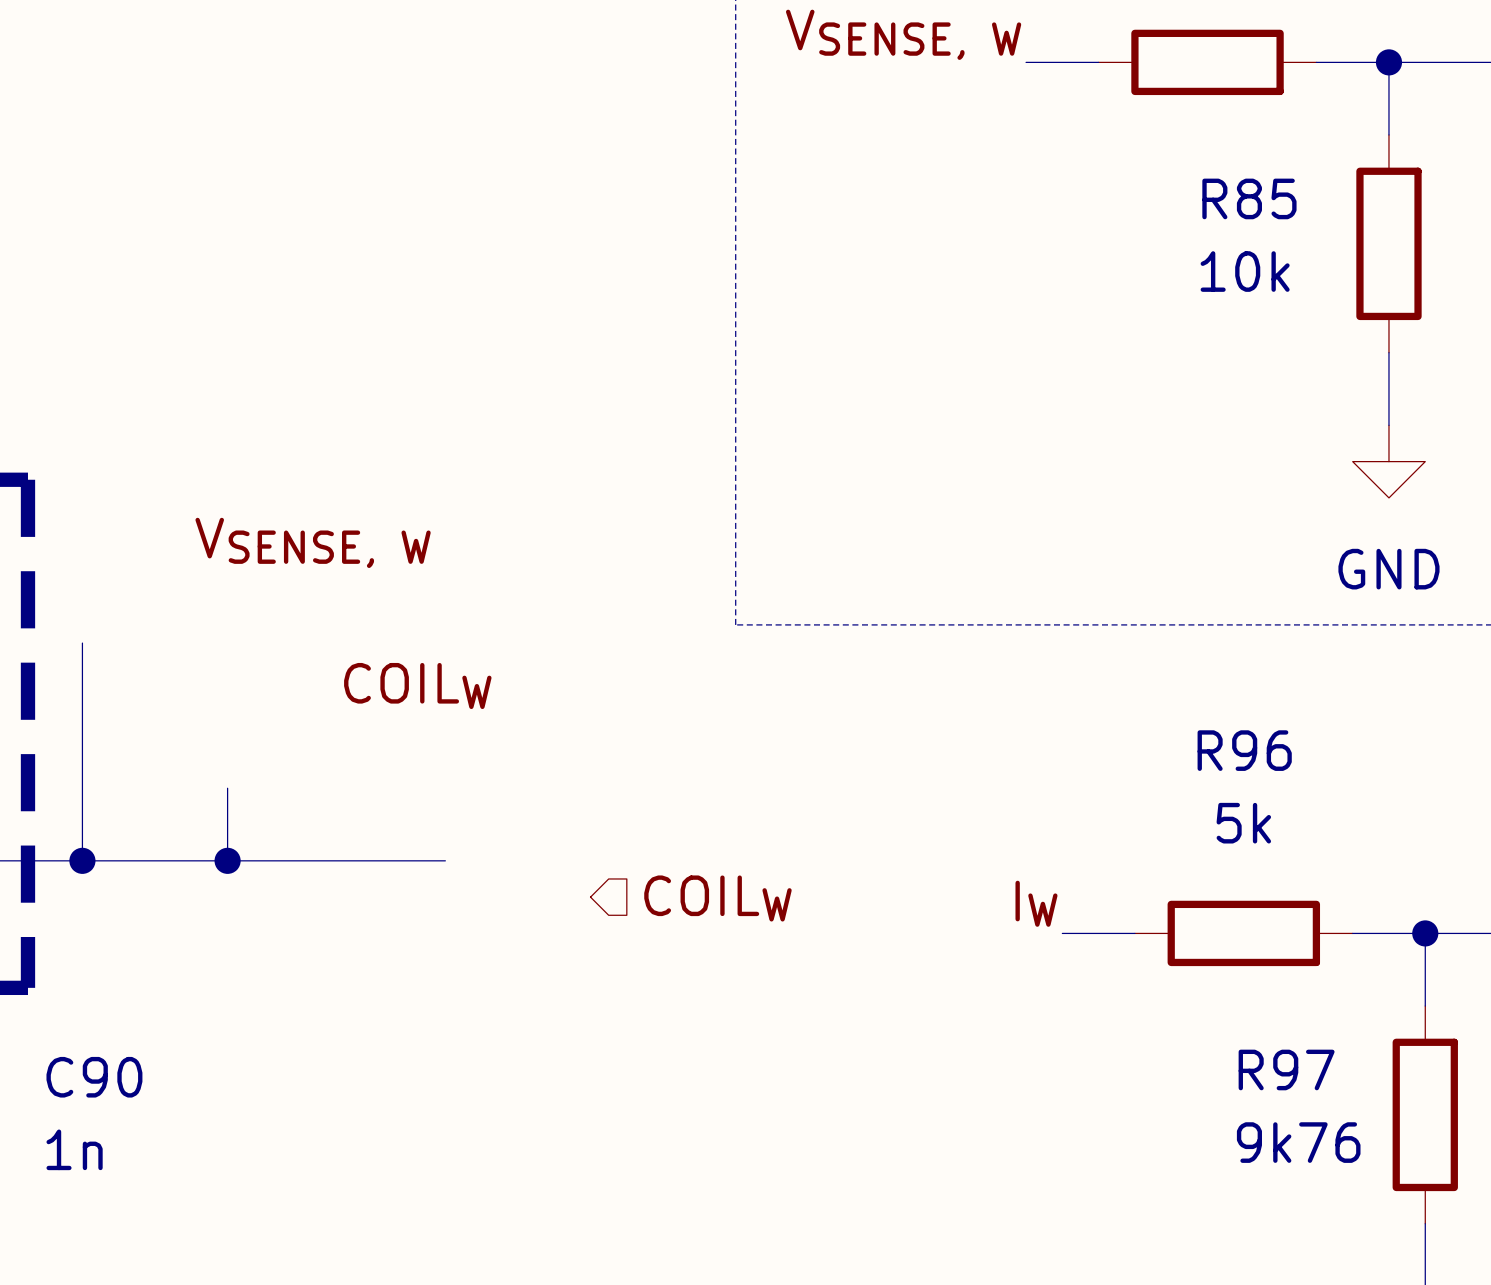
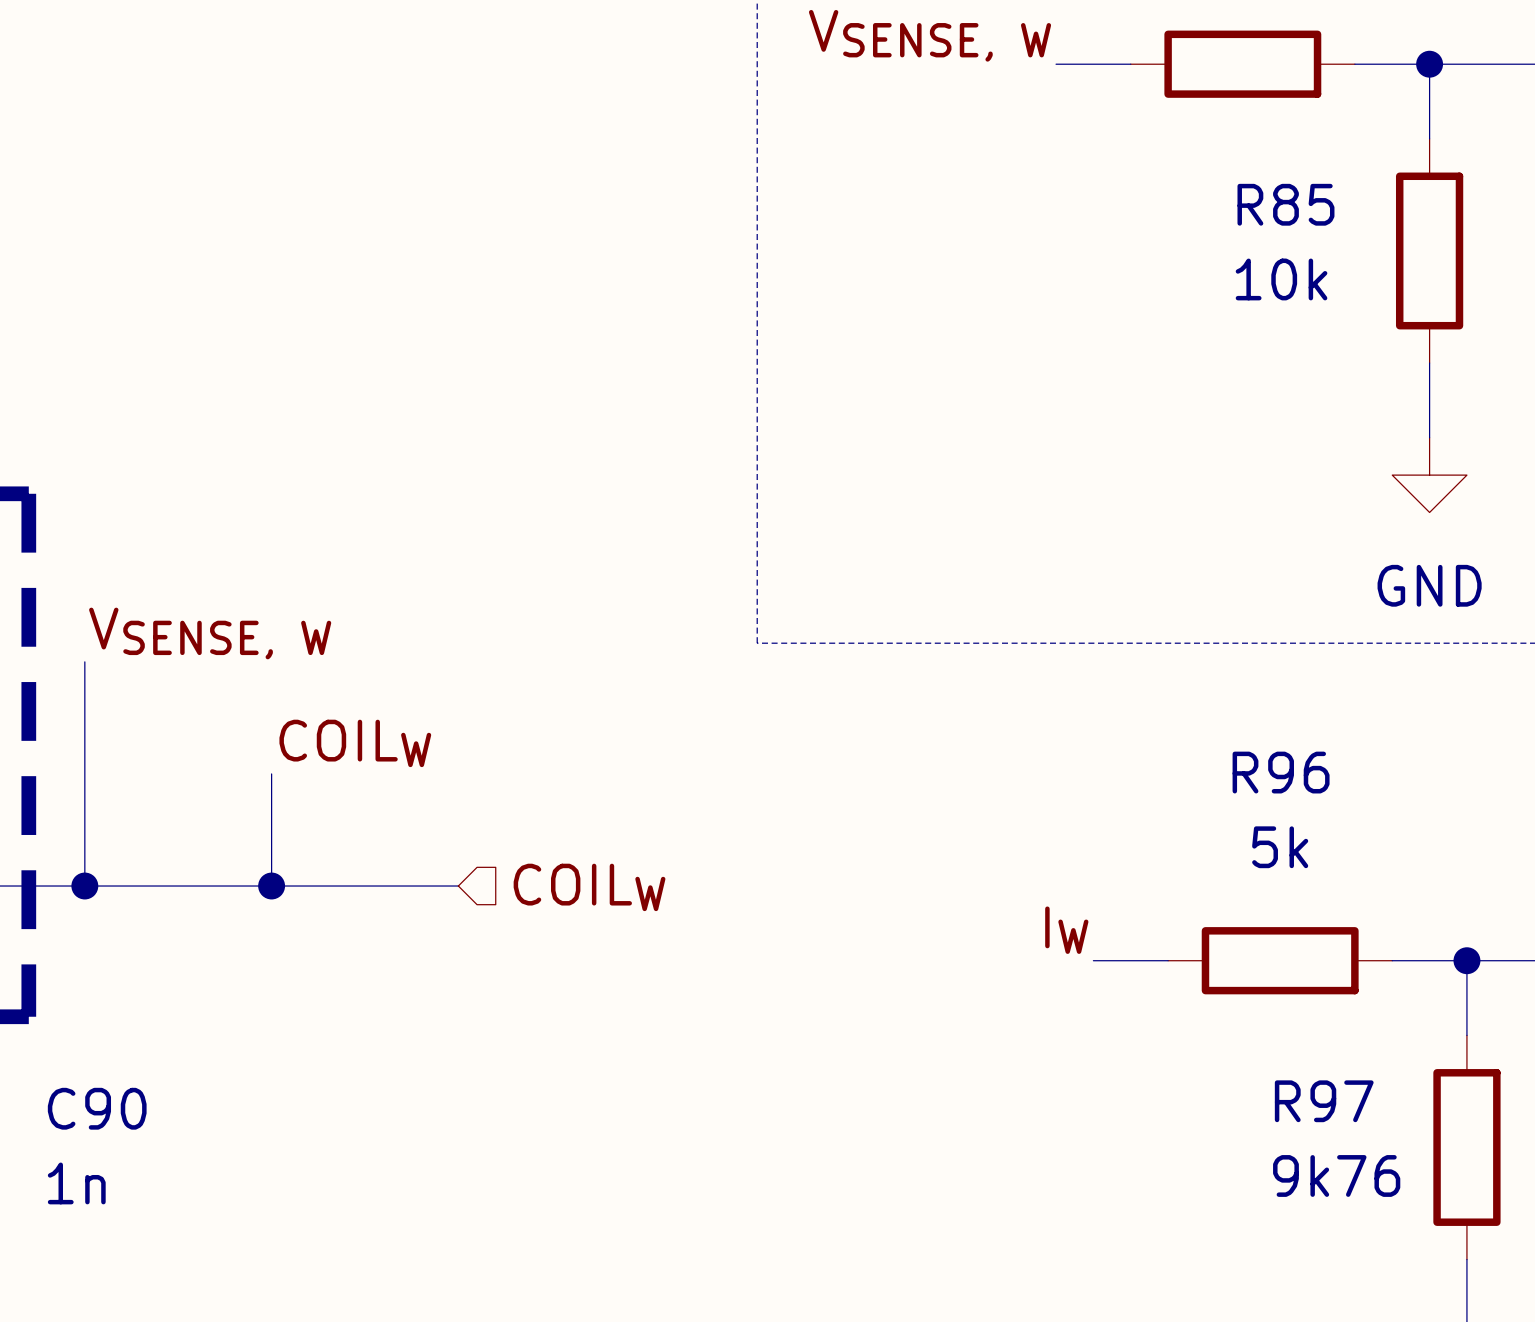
label position: VSENSE, W (313, 542) -> VSENSE, W (210, 633)
label position: COILW (417, 686) -> COILW (355, 743)
wire: none -> (271, 773) (271, 886)
wire: (227, 788) (227, 860) -> none
junction position: (227, 860) -> (271, 886)
hierarchical label position: COILW (717, 898) -> COILW (589, 887)

